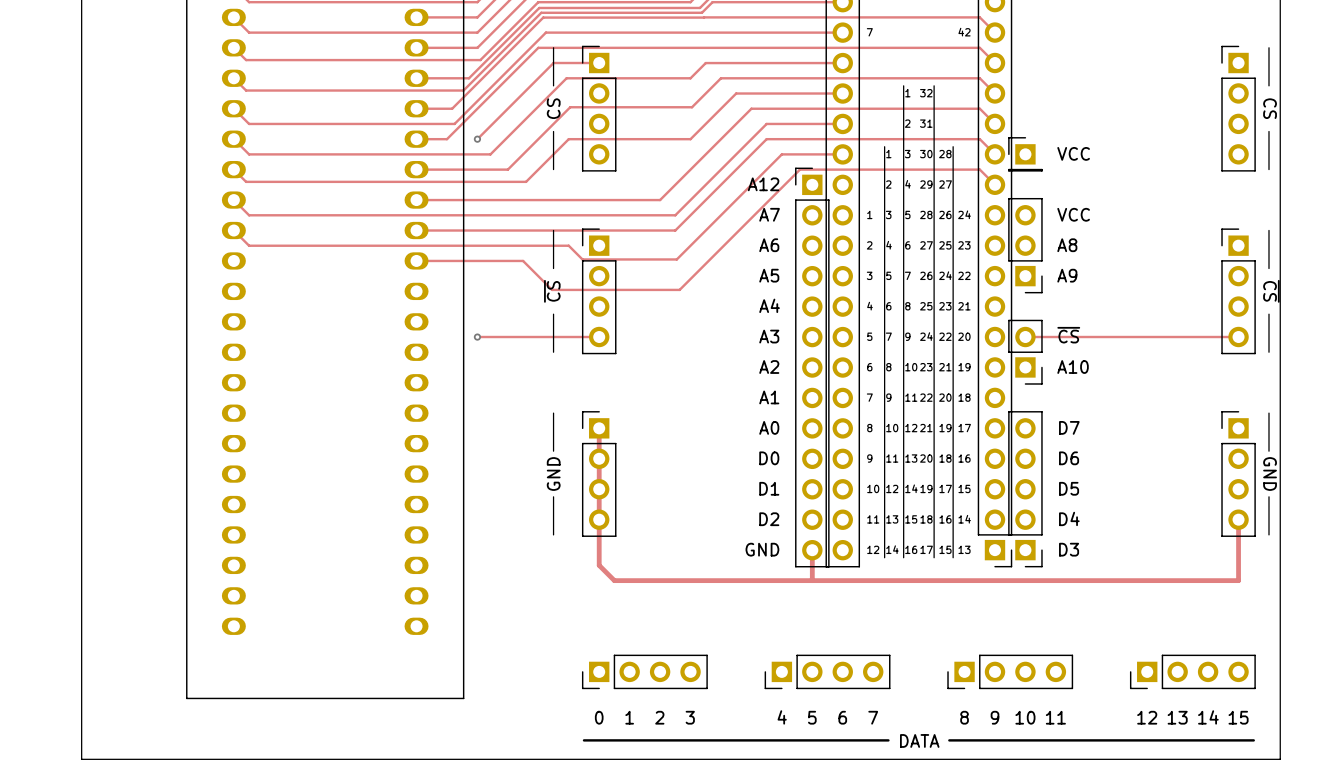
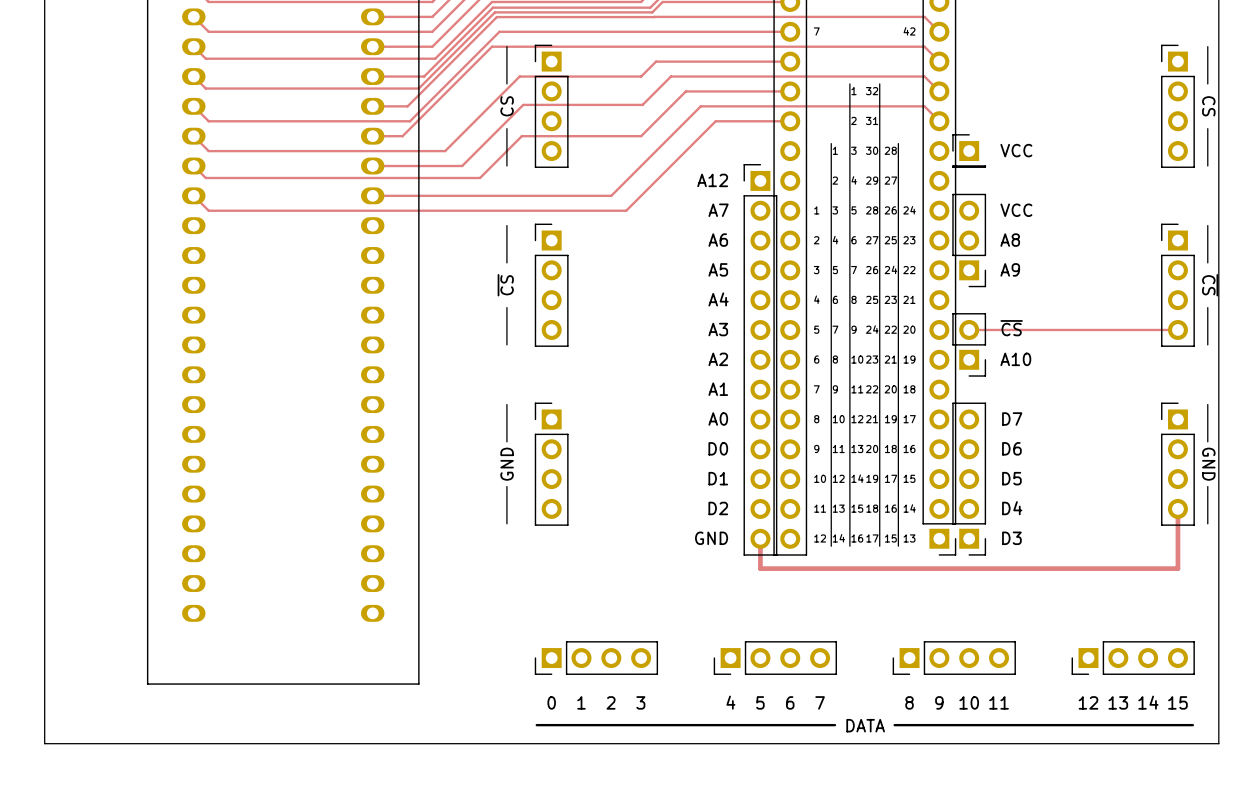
track: (599, 63) (553, 63) (477, 139) -> none
via: (477, 139) -> none
track: (842, 154) (781, 154) (676, 259) (582, 259) (568, 245) (249, 245) (233, 230) -> none
track: (994, 154) (979, 139) (766, 139) (675, 230) (416, 230) -> none
track: (994, 184) (979, 169) (799, 169) (679, 289) (552, 289) (523, 260) (416, 260) -> none
track: (477, 337) (599, 337) -> none
via: (477, 337) -> none
track: (599, 428) (599, 565) (614, 580) (812, 580) -> none

